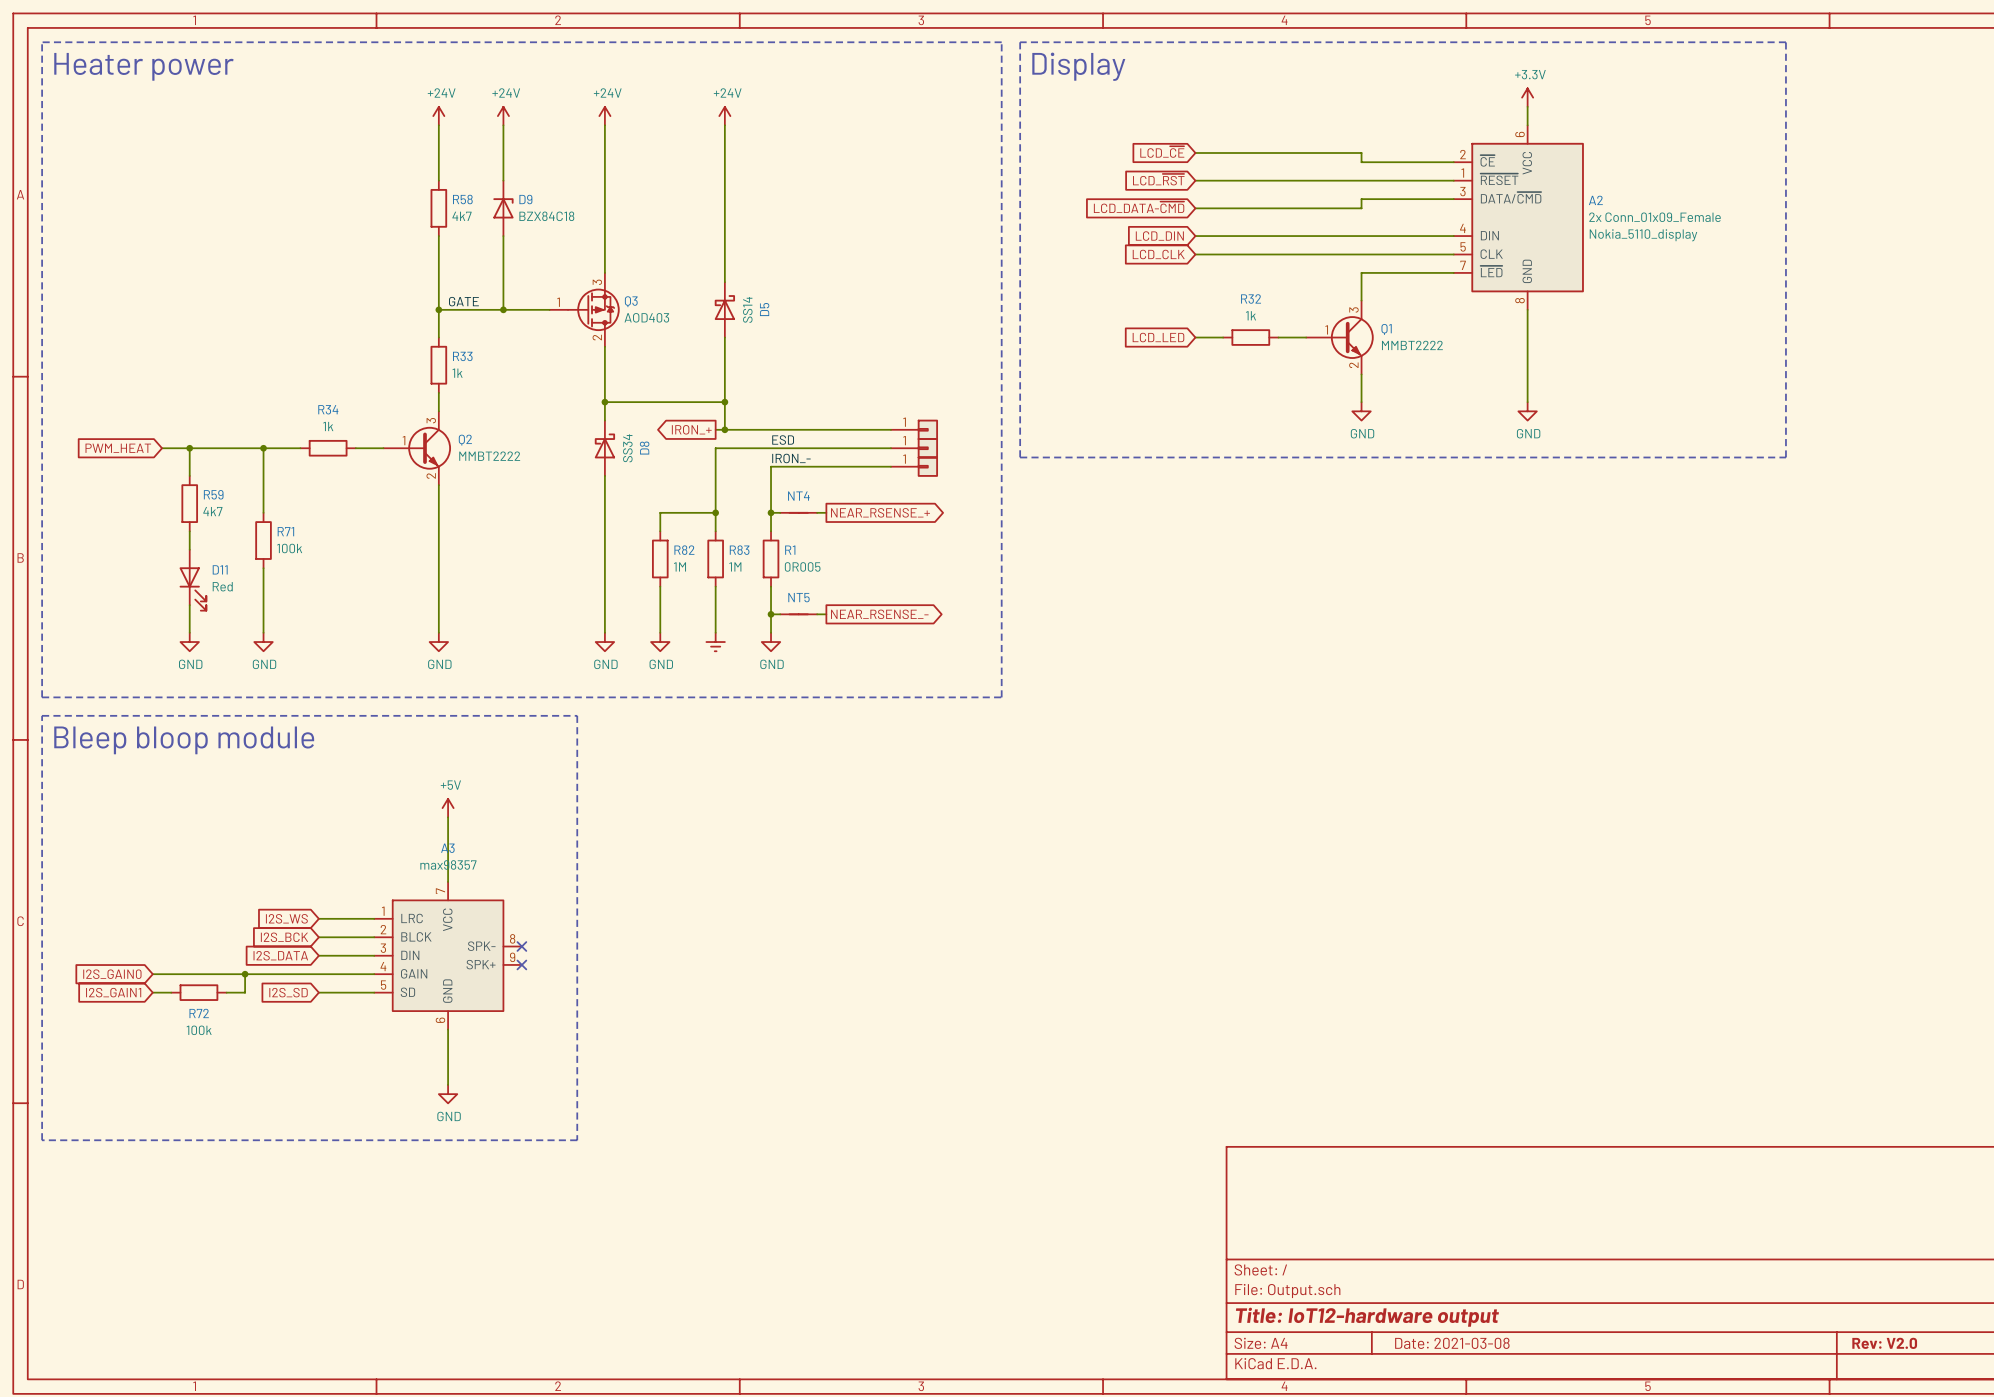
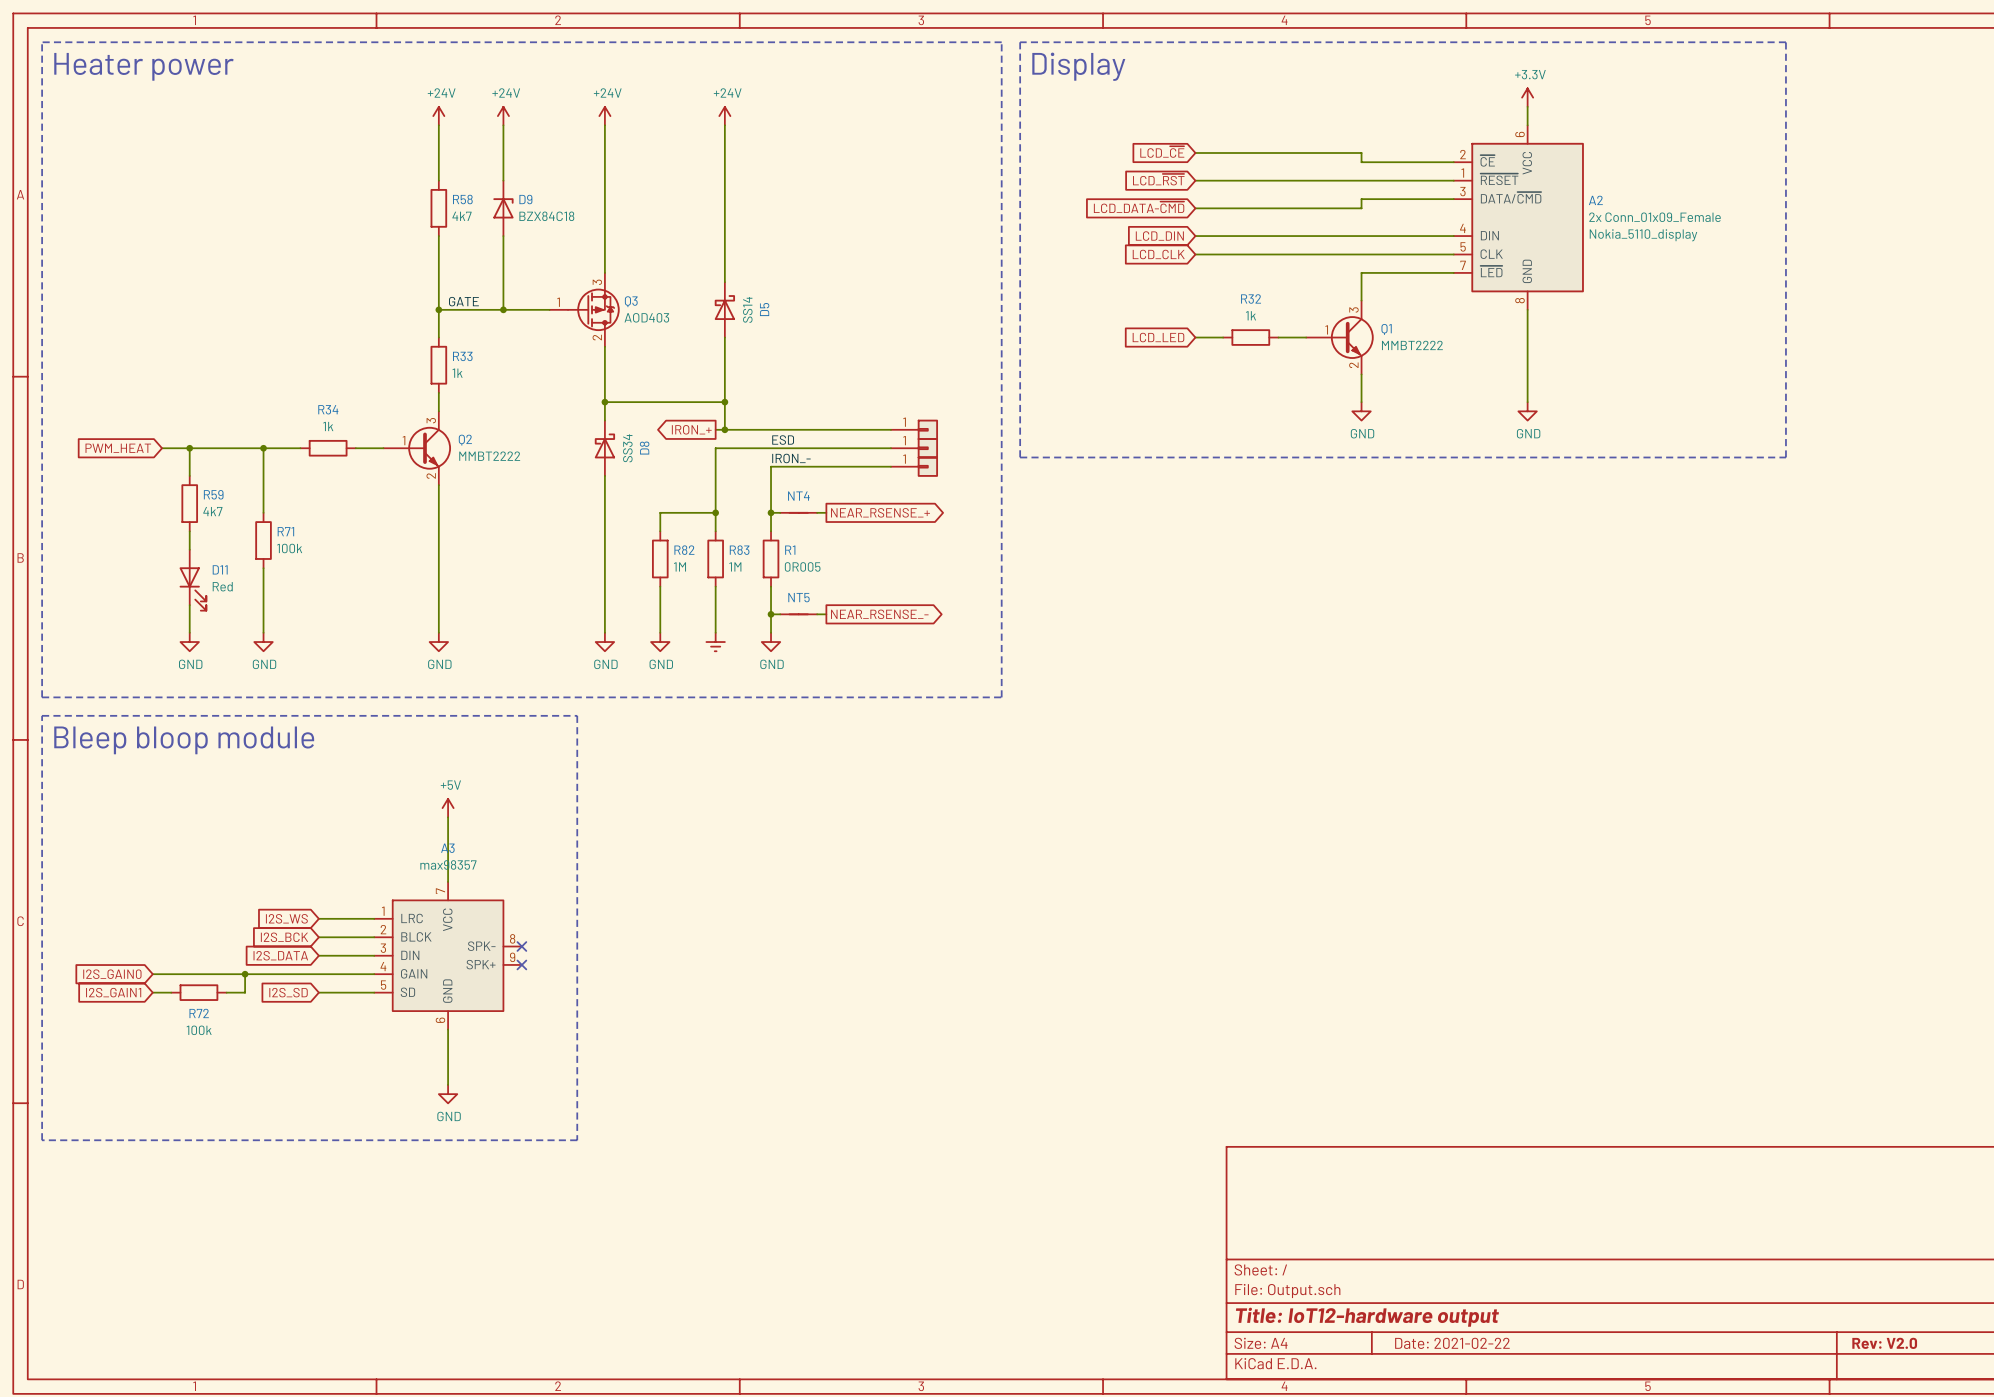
title block: Date: 2021-03-08 (1452, 1343) -> Date: 2021-02-22 (1452, 1343)

